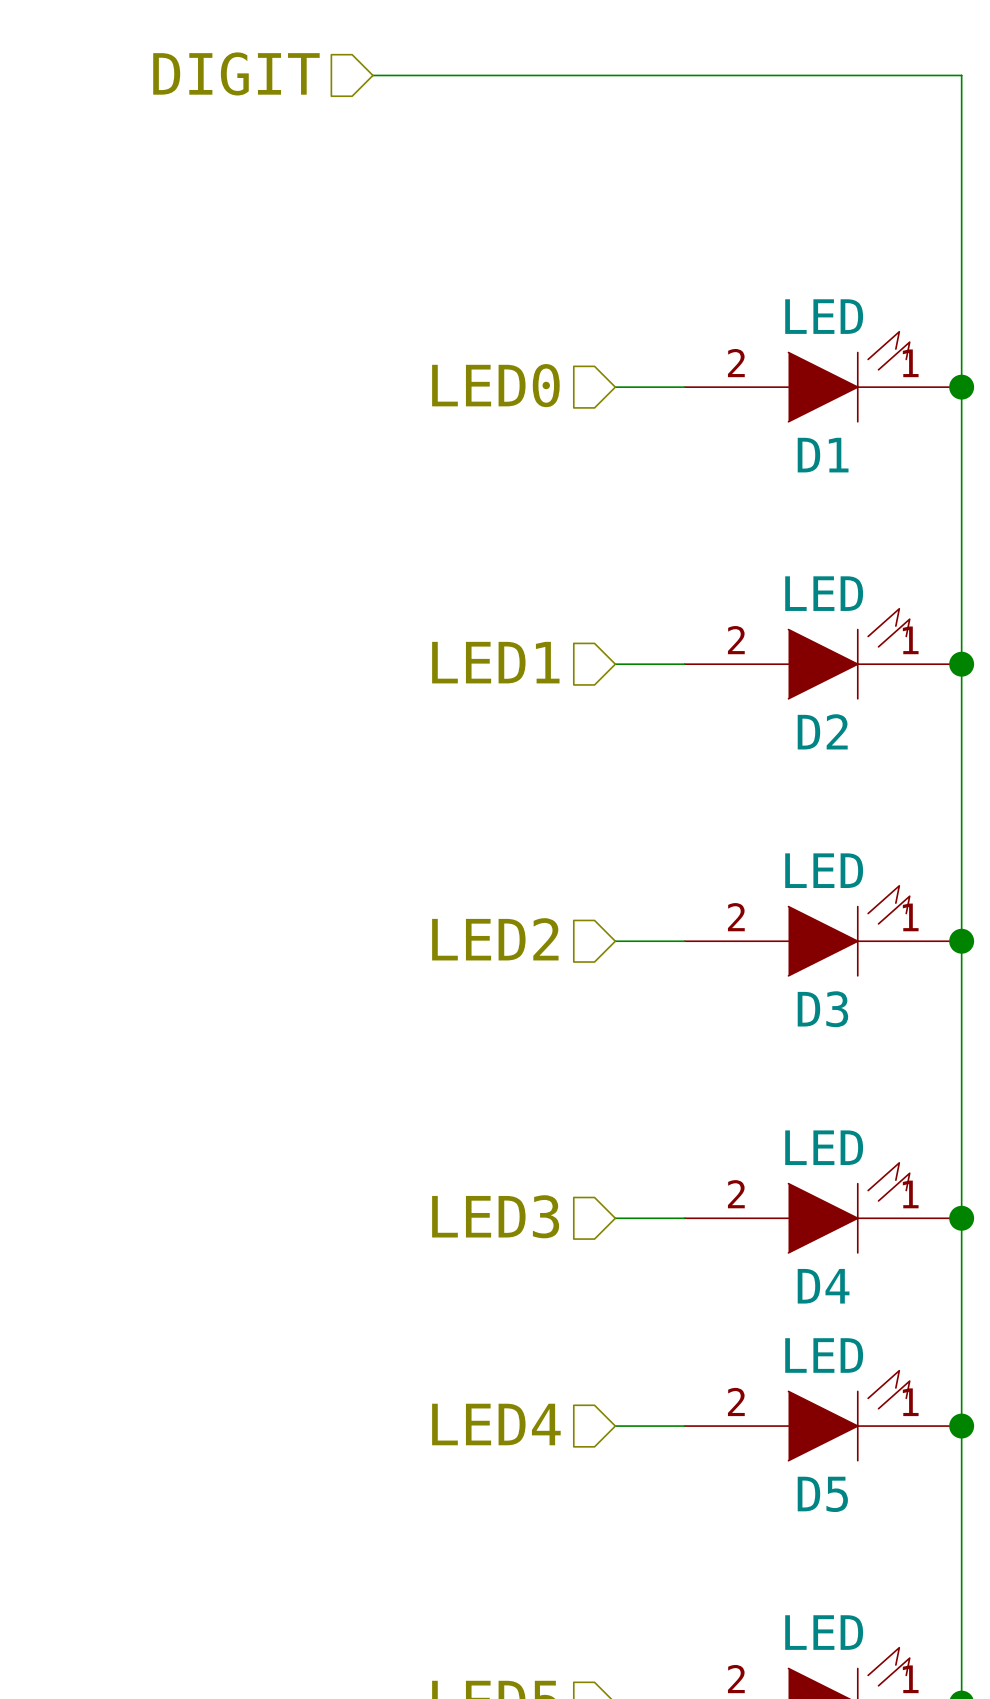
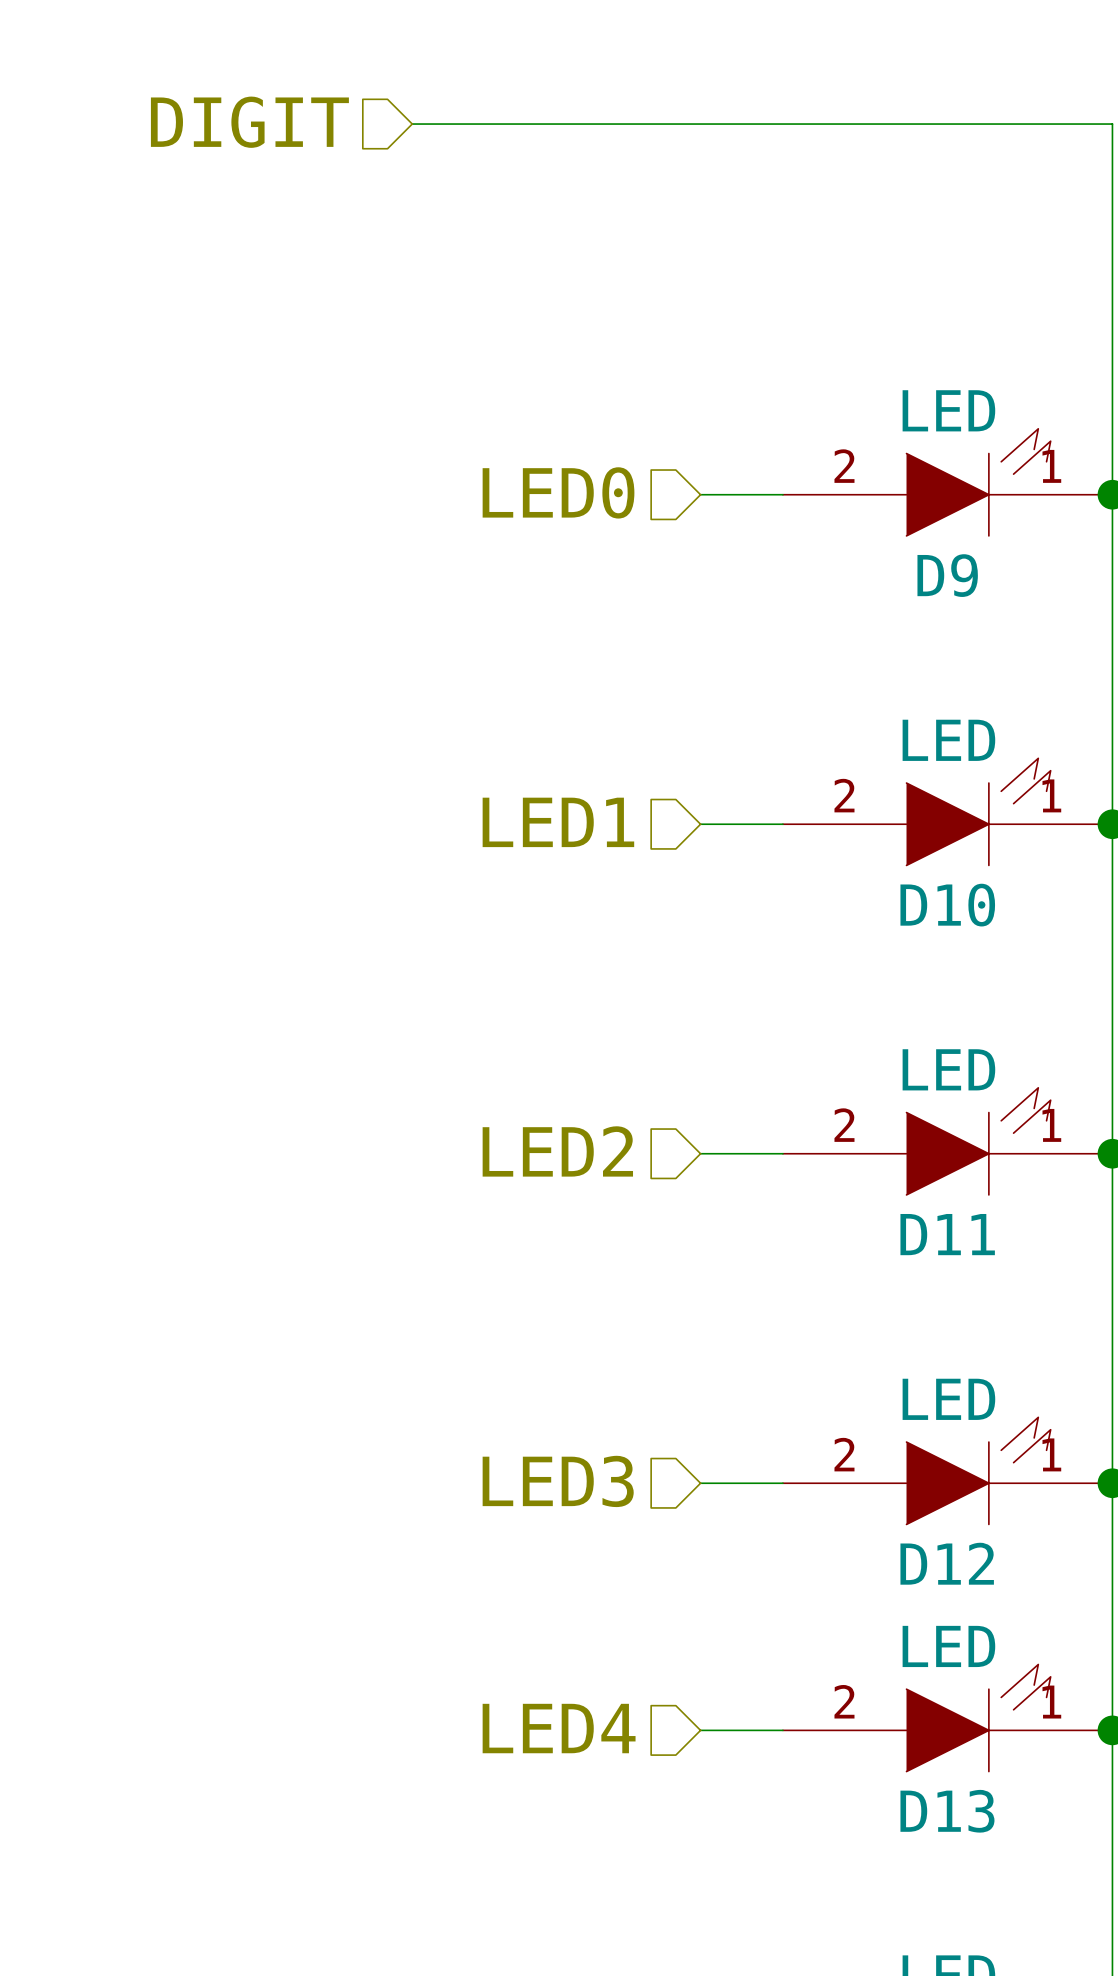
D1 name: D1 (823, 455) -> D9 (947, 575)
D2 name: D2 (822, 731) -> D10 (947, 905)
D3 name: D3 (822, 1009) -> D11 (947, 1234)
D4 name: D4 (823, 1286) -> D12 (947, 1563)
D5 name: D5 (822, 1494) -> D13 (947, 1811)

